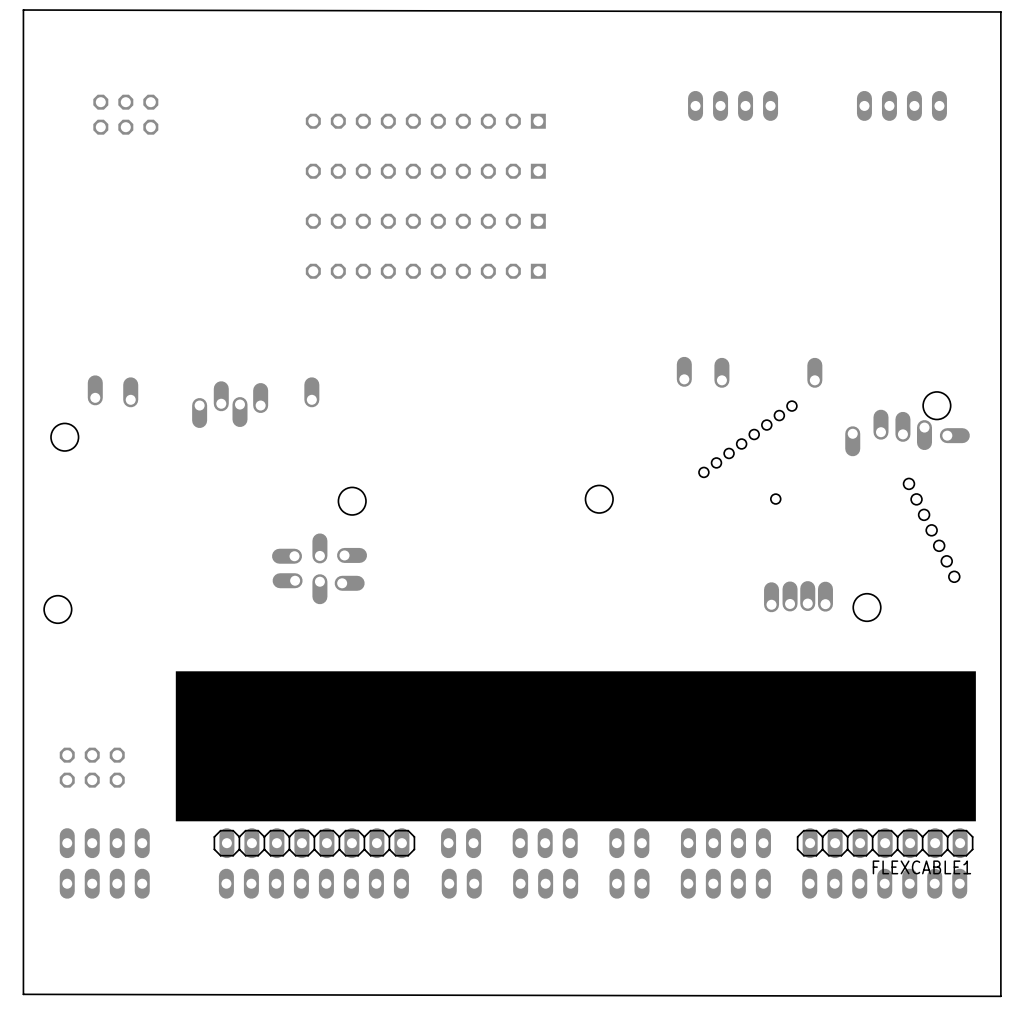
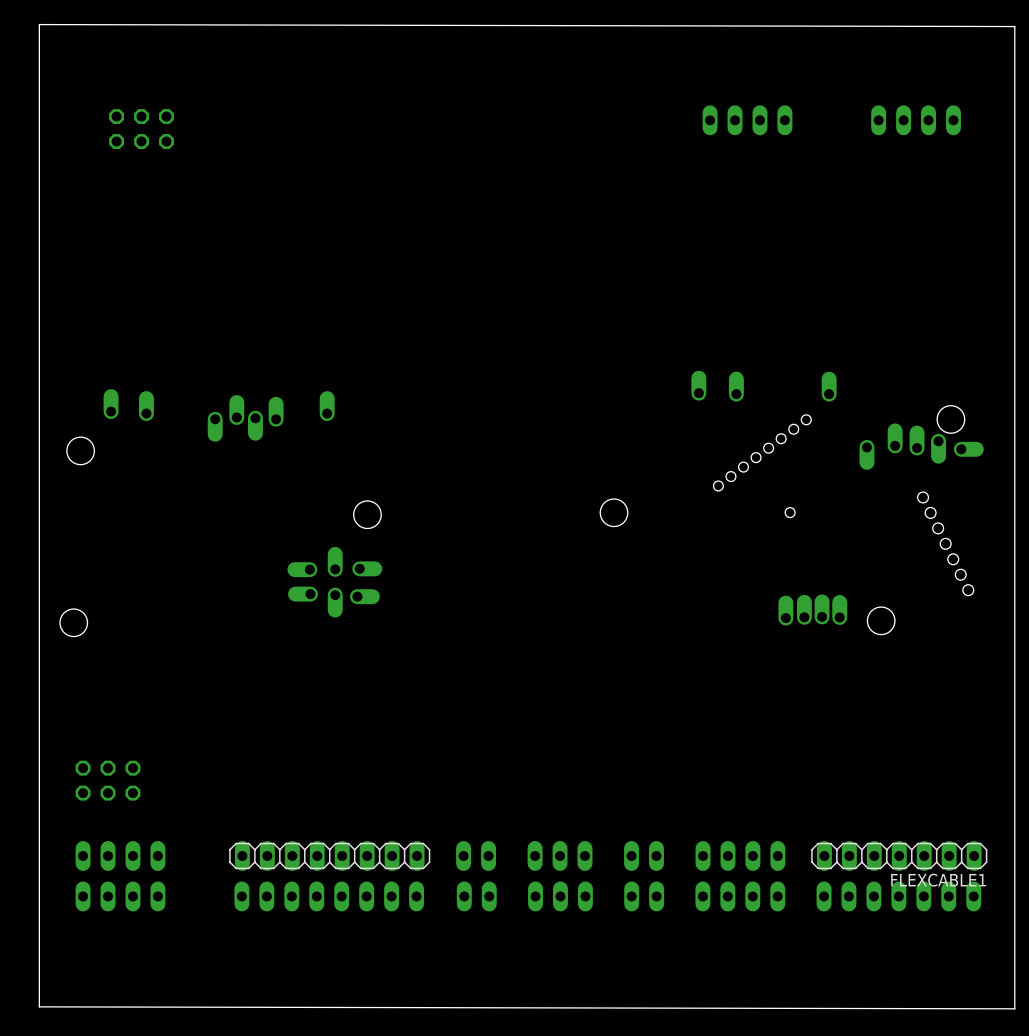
part: (425, 121) -> none
part: (425, 171) -> none
part: (425, 221) -> none
part: (425, 271) -> none
drawing: [175, 671, 976, 822] -> none

